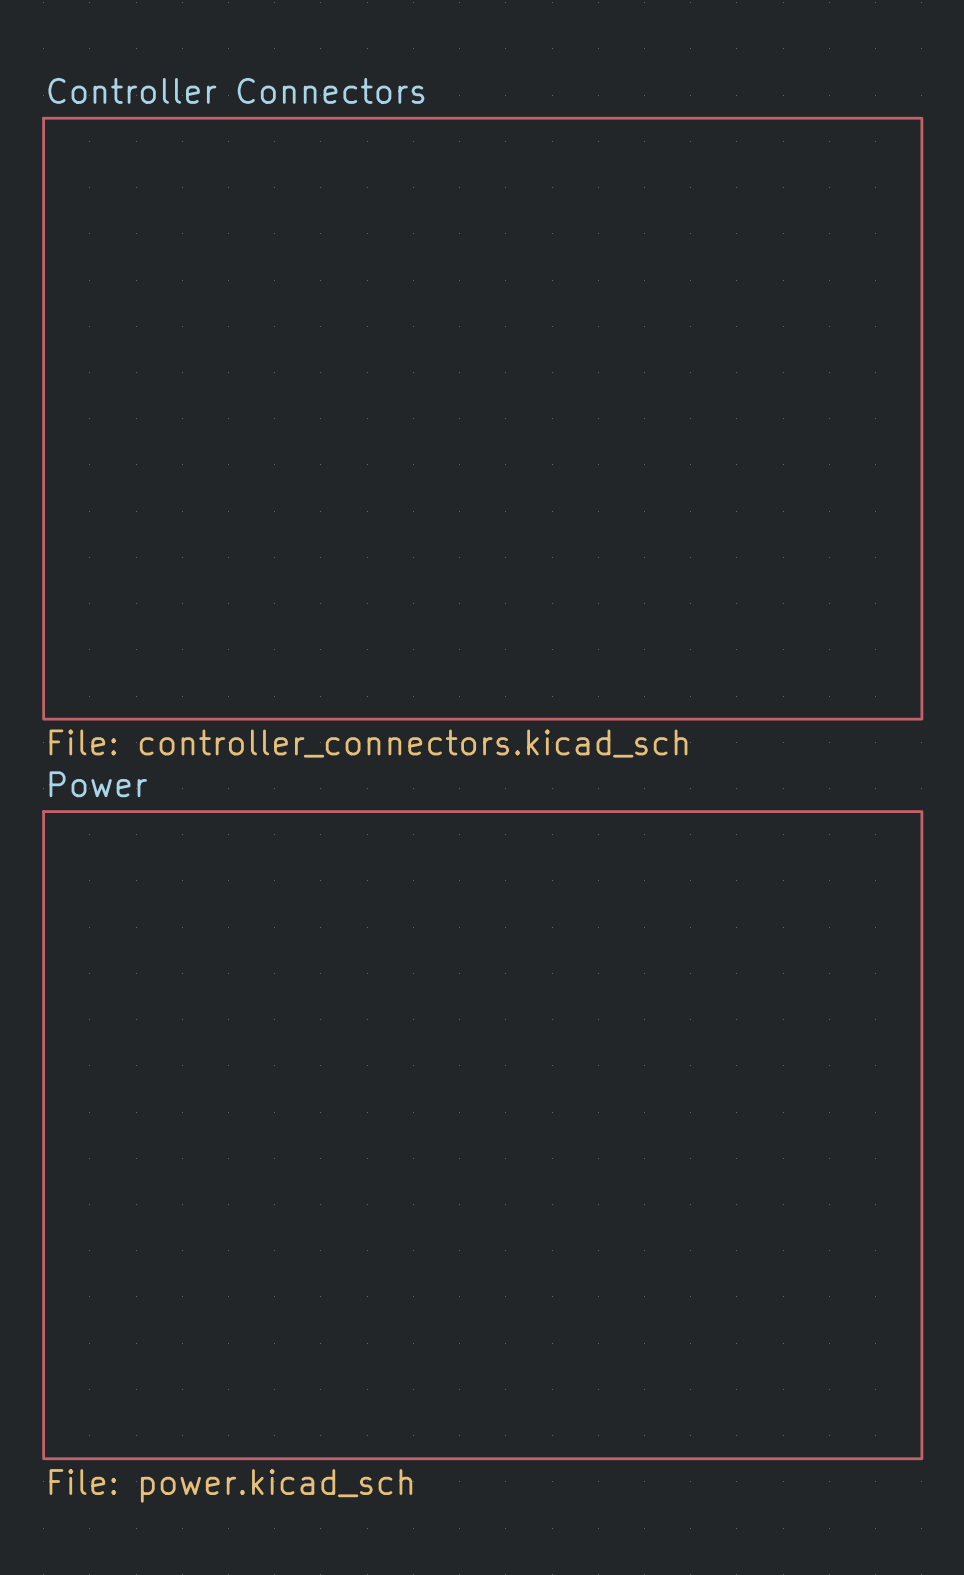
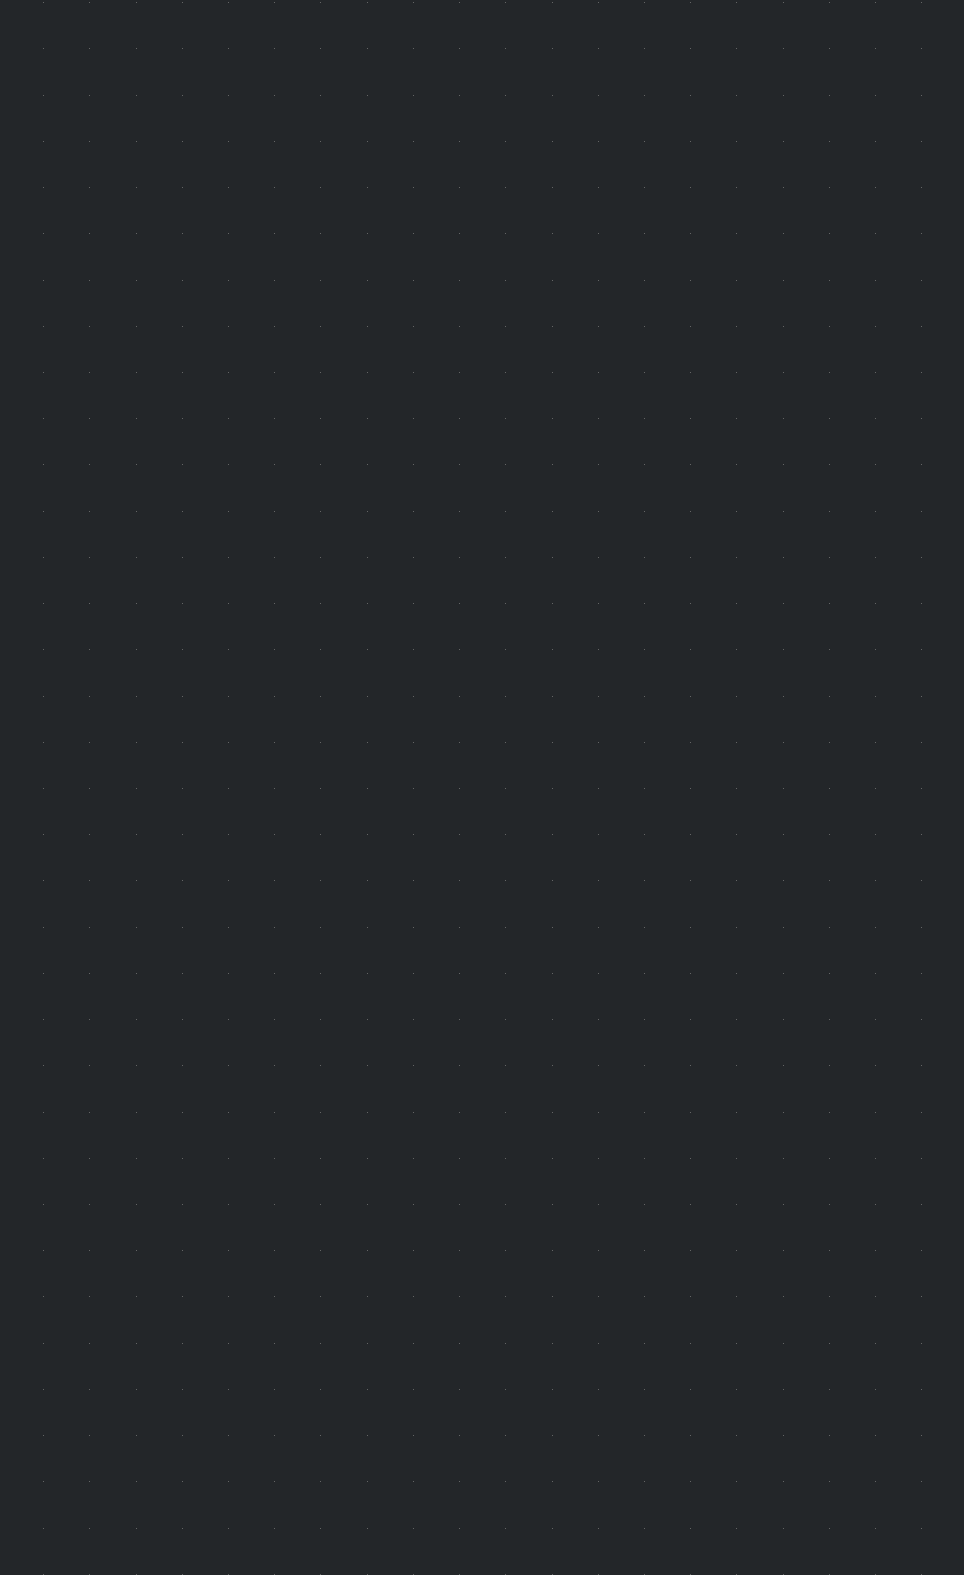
sheet Controller Connectors: File: controller_connectors.kicad_sch (482, 418) -> none
sheet Power: File: power.kicad_sch (482, 1135) -> none

